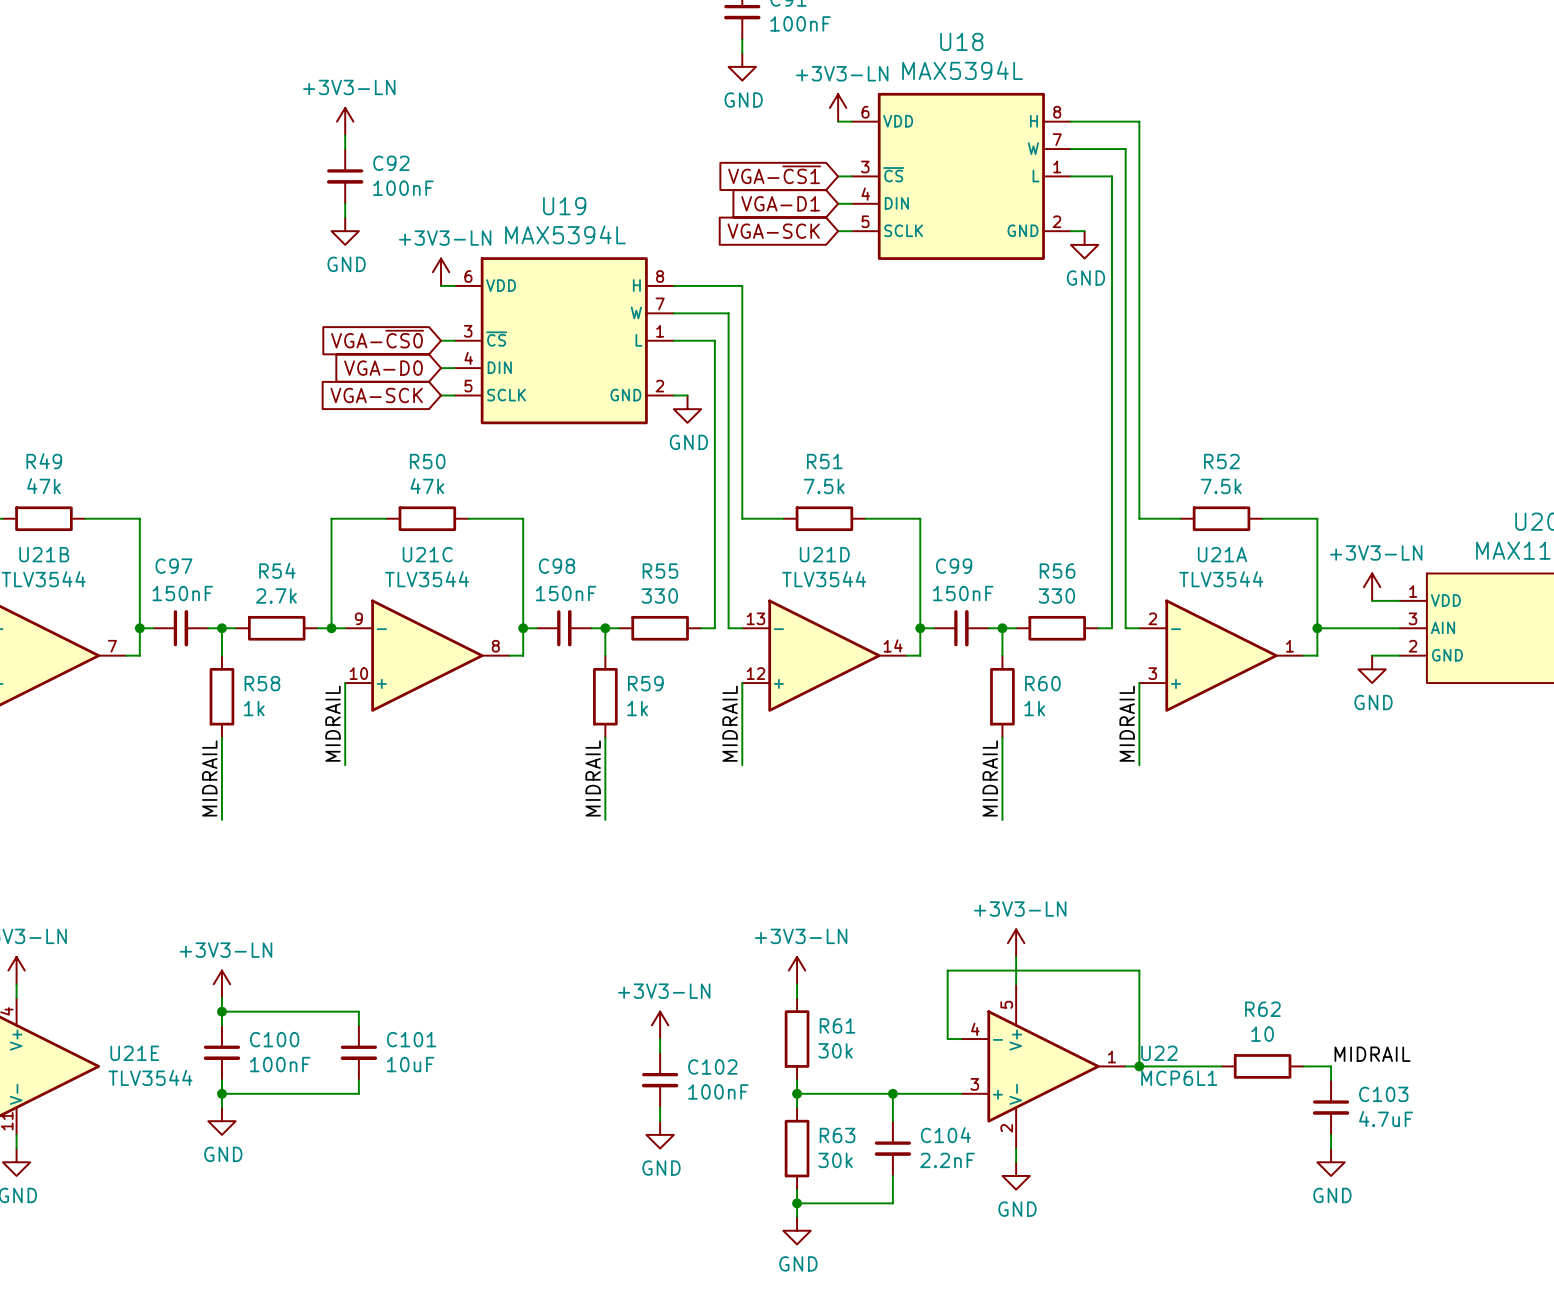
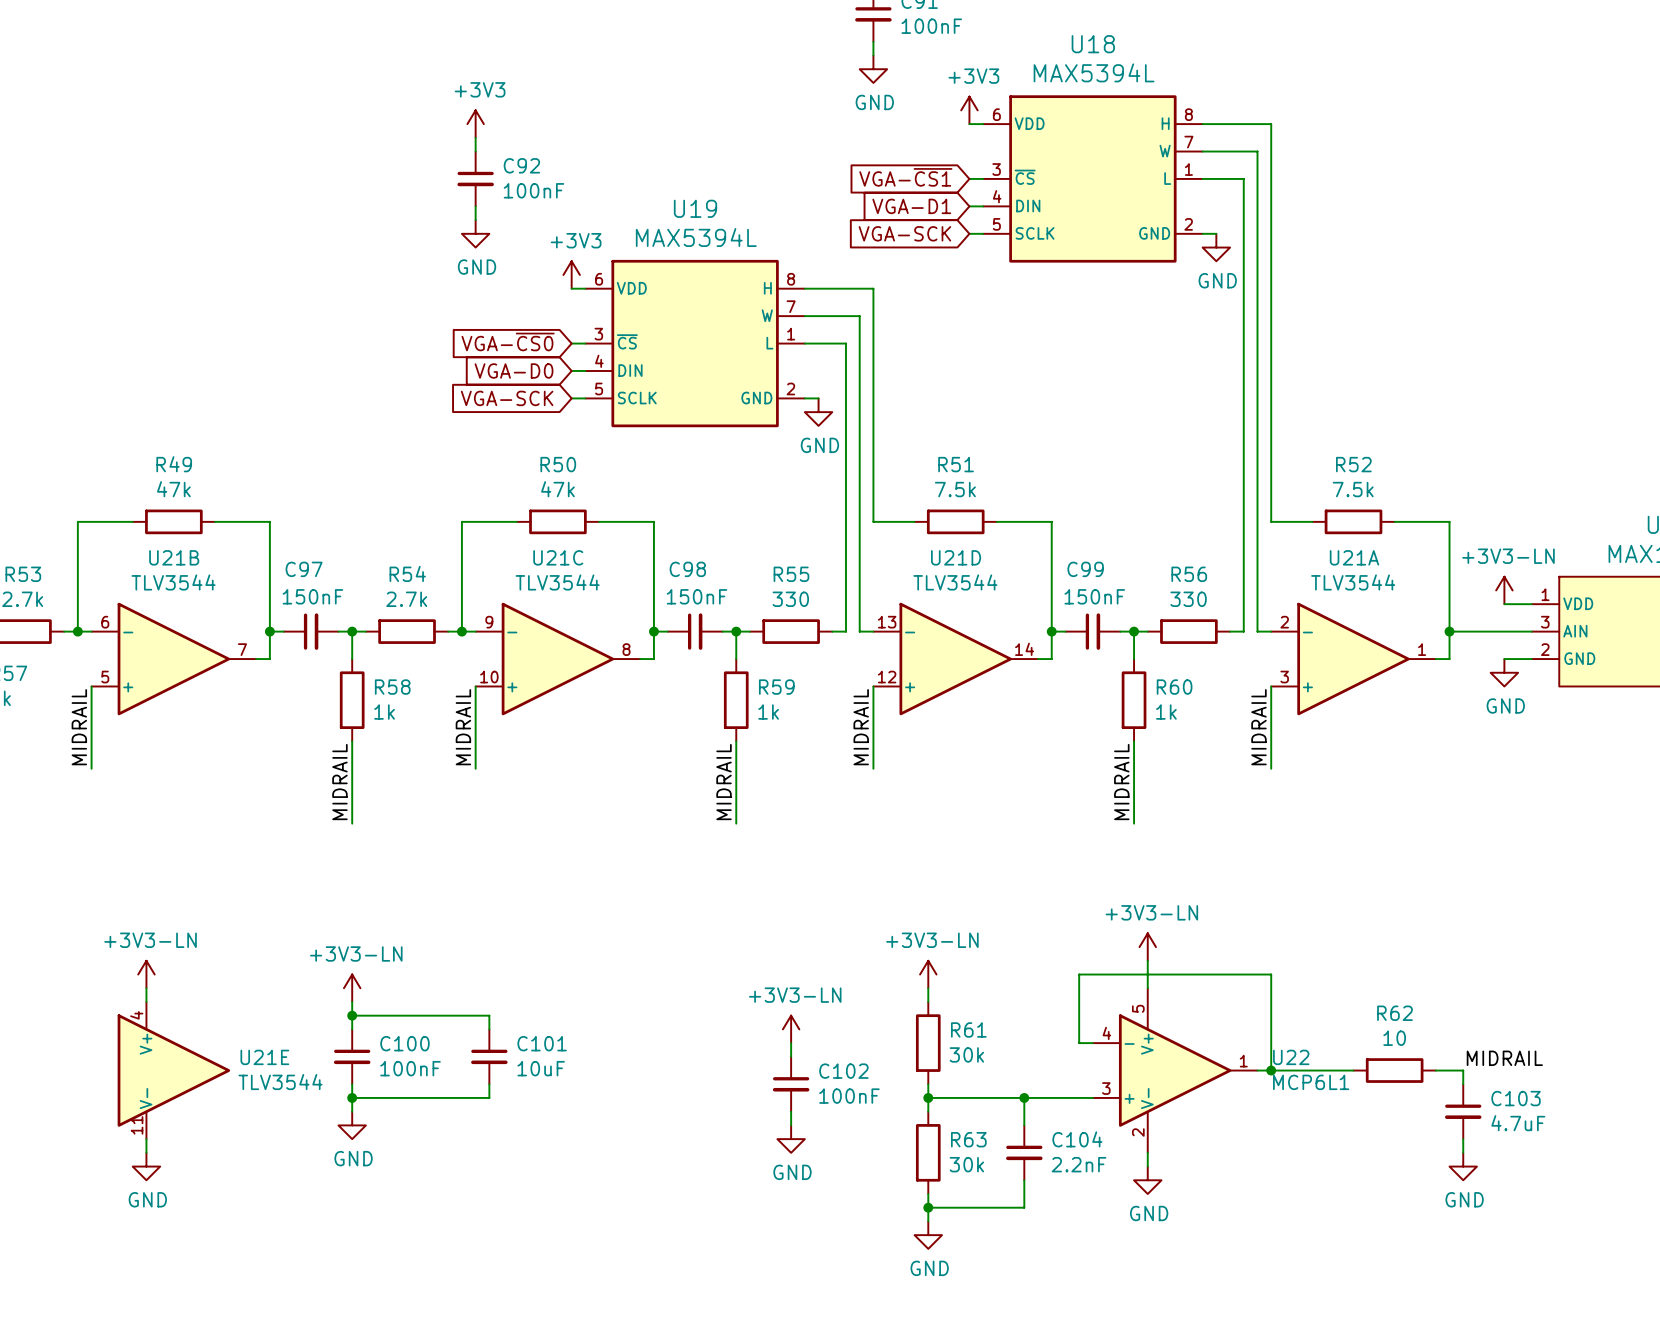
power symbol: +3V3-LN (838, 107) -> +3V3 (969, 110)
power symbol: +3V3-LN (345, 121) -> +3V3 (475, 124)
power symbol: +3V3-LN (441, 272) -> +3V3 (571, 274)

